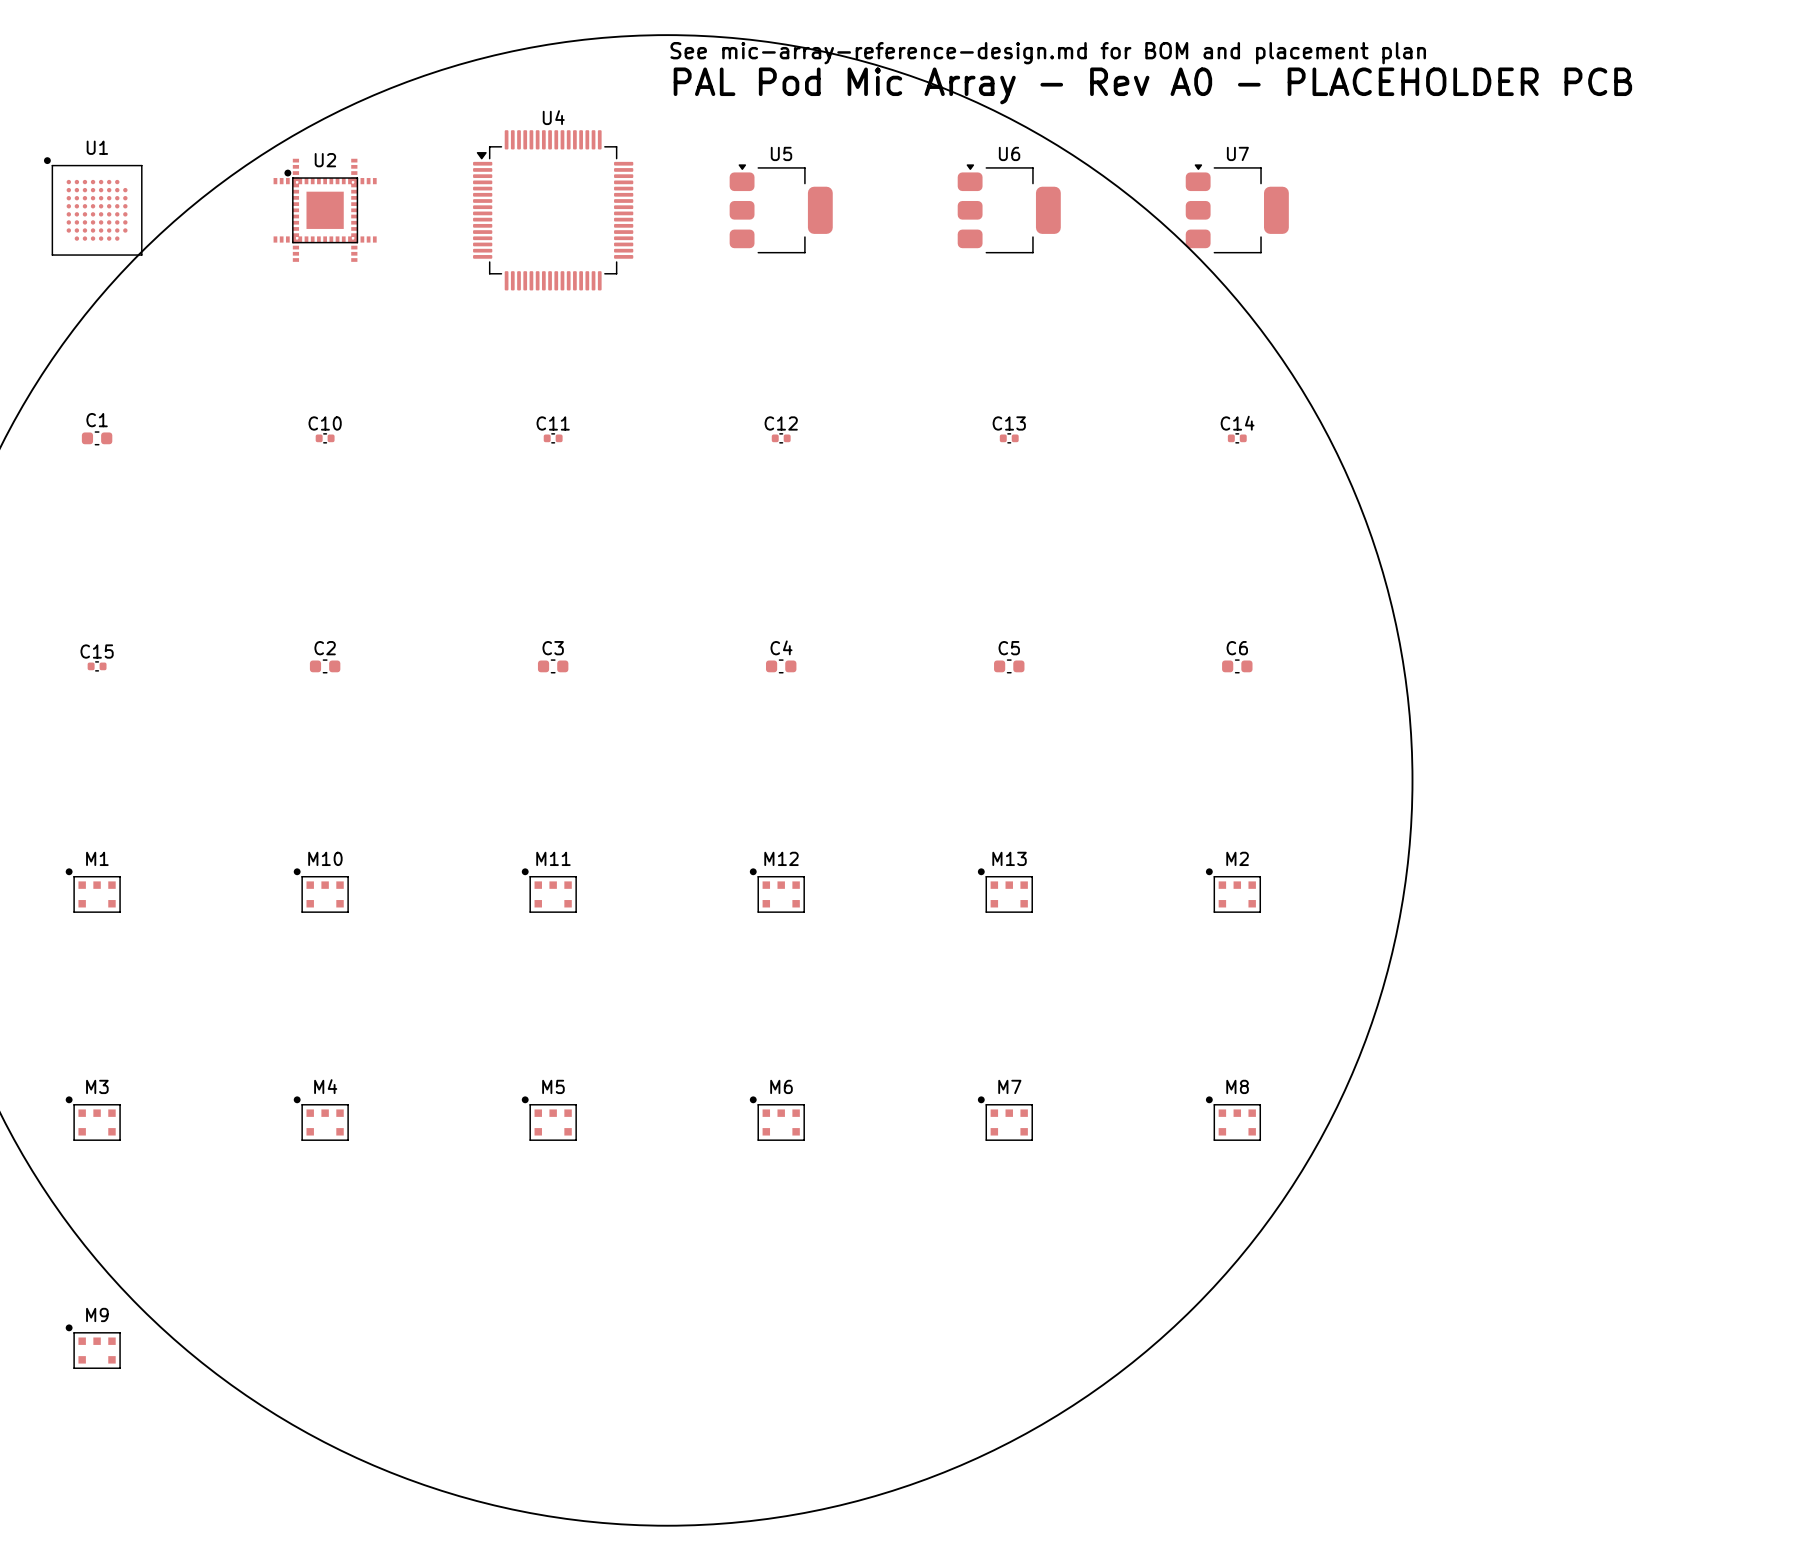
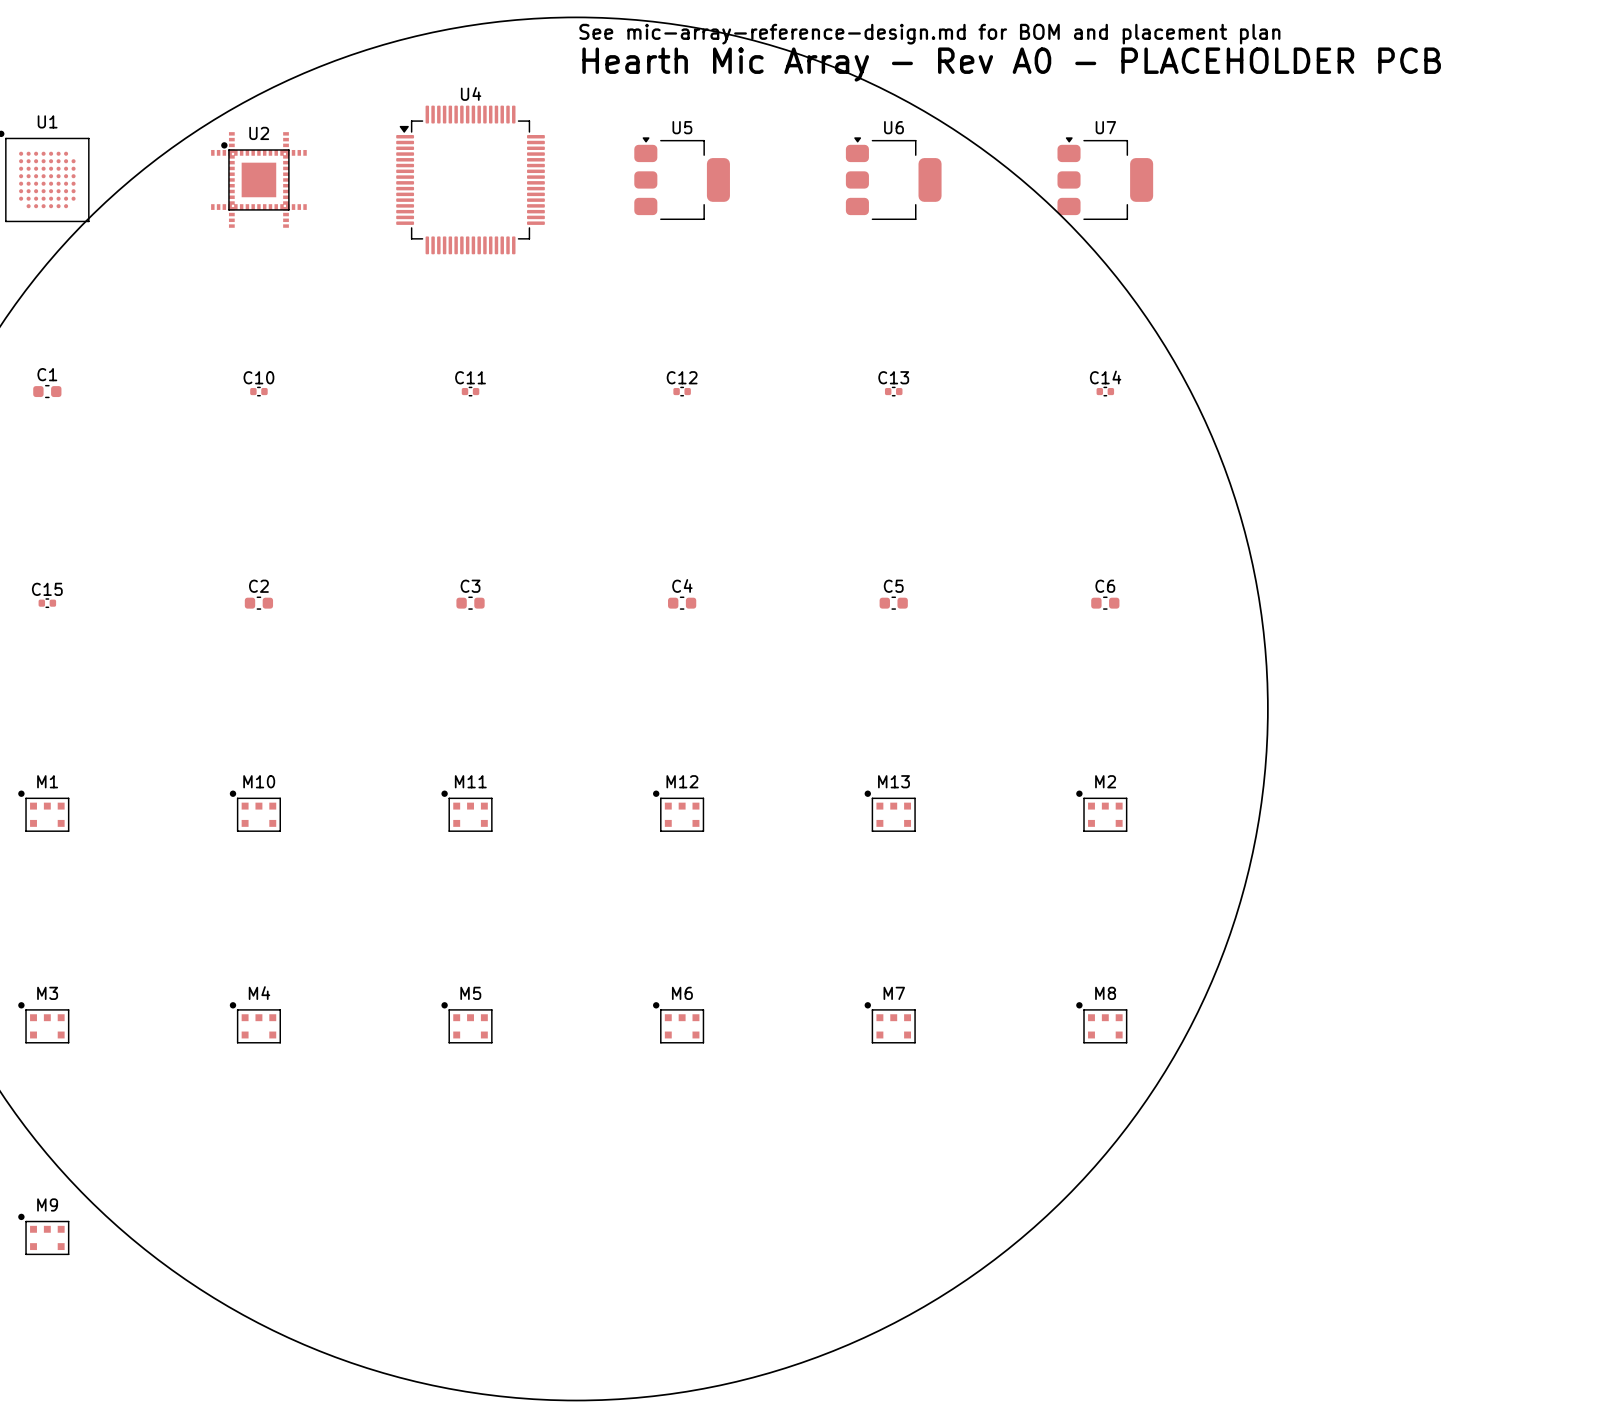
text: PAL Pod Mic Array - Rev A0 - PLACEHOLDER PCB (1152, 85) -> Hearth Mic Array - Rev A0 - PLACEHOLDER PCB (1011, 64)

